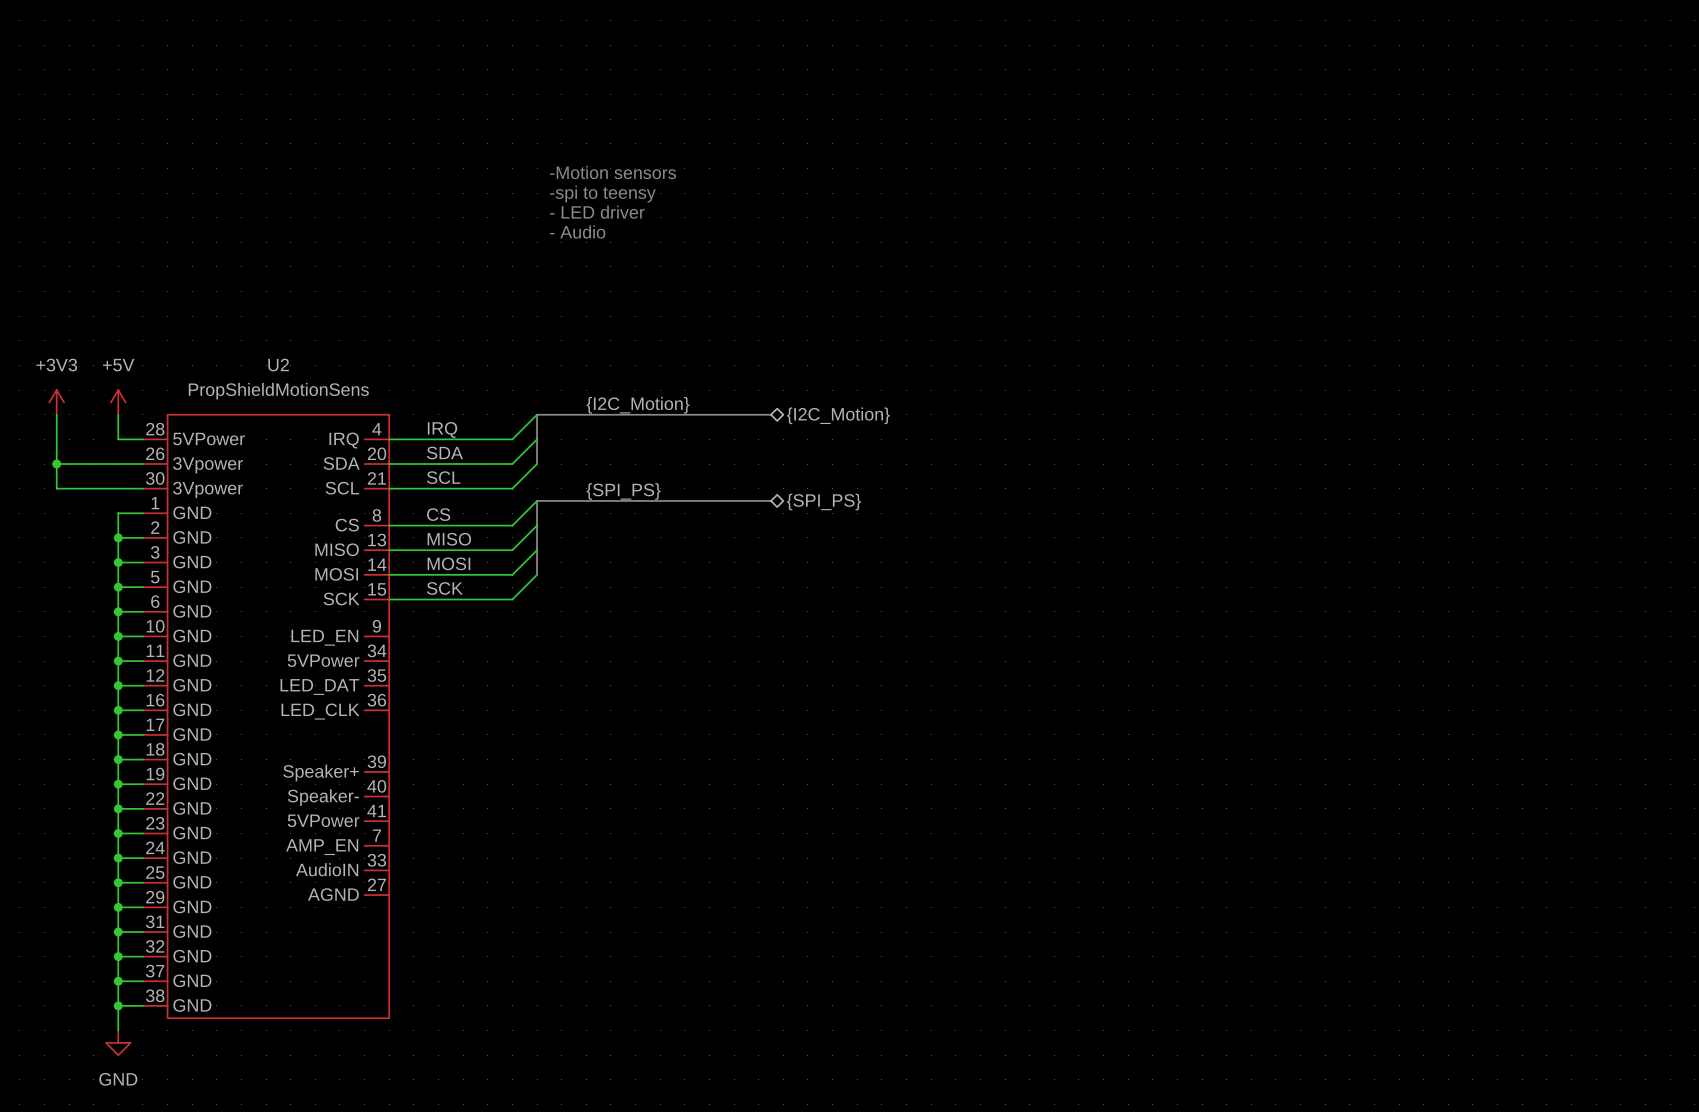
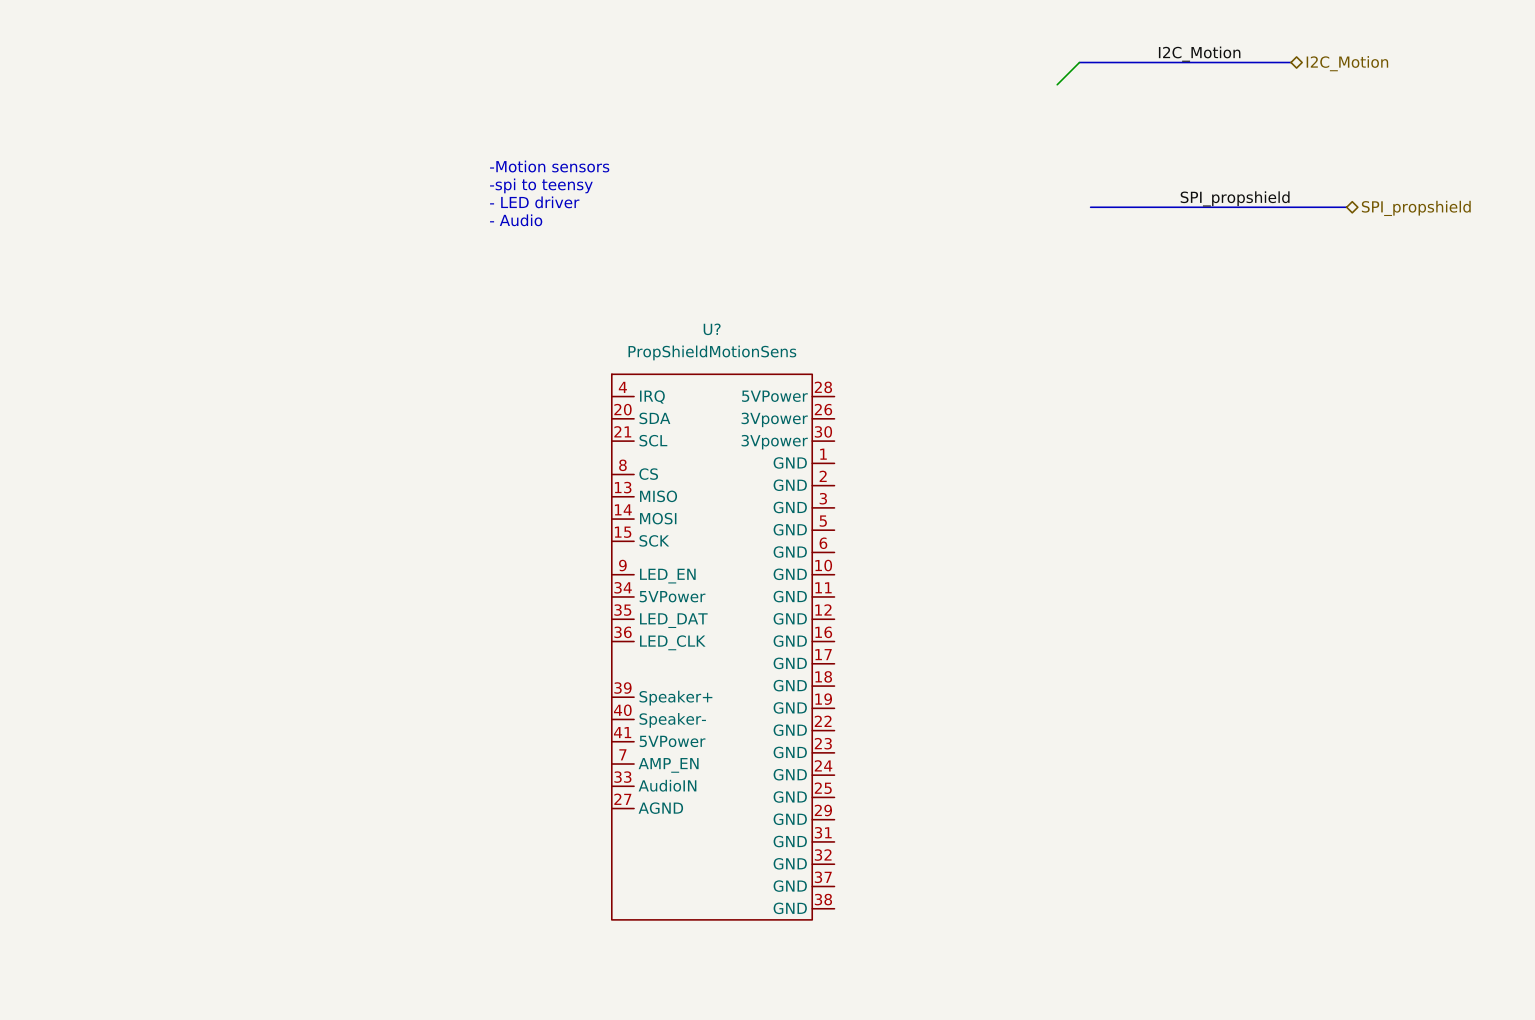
label: none -> I2C_Motion (1199, 54)
wire: none -> (1079, 62) (1057, 84)
bus: none -> (1079, 62) (1291, 62)
hierarchical label: none -> I2C_Motion (1347, 63)
label: none -> SPI_propshield (1235, 198)
bus: none -> (1090, 207) (1346, 207)
hierarchical label: none -> SPI_propshield (1416, 208)
power symbol: +3V3 (56, 402) -> none
power symbol: +5V (118, 402) -> none
label: {I2C_Motion} (638, 405) -> none
wire: (56, 414) (56, 488) (142, 488) -> none
wire: (118, 414) (118, 439) (142, 439) -> none
wire: (537, 414) (512, 439) (389, 439) -> none
bus: (771, 414) (537, 414) (537, 464) -> none
hierarchical label: {I2C_Motion} (838, 415) -> none
label: IRQ (442, 429) -> none
wire: (537, 439) (512, 464) (389, 464) -> none
label: SDA (444, 453) -> none
wire: (56, 464) (142, 464) -> none
junction: (56, 464) -> none
wire: (537, 464) (512, 488) (389, 488) -> none
label: SCL (443, 477) -> none
label: {SPI_PS} (623, 491) -> none
wire: (537, 500) (512, 525) (389, 525) -> none
bus: (771, 500) (537, 500) (537, 574) -> none
hierarchical label: {SPI_PS} (823, 502) -> none
wire: (142, 513) (118, 513) (118, 1030) -> none
label: CS (438, 514) -> none
wire: (537, 525) (512, 550) (389, 550) -> none
wire: (118, 537) (142, 537) -> none
junction: (118, 537) -> none
label: MISO (449, 539) -> none
wire: (537, 550) (512, 574) (389, 574) -> none
wire: (118, 562) (142, 562) -> none
junction: (118, 562) -> none
label: MOSI (448, 563) -> none
wire: (537, 574) (512, 599) (389, 599) -> none
wire: (118, 587) (142, 587) -> none
junction: (118, 587) -> none
label: SCK (444, 588) -> none
wire: (118, 611) (142, 611) -> none
junction: (118, 611) -> none
wire: (118, 636) (142, 636) -> none
junction: (118, 636) -> none
wire: (118, 661) (142, 661) -> none
junction: (118, 661) -> none
wire: (118, 685) (142, 685) -> none
junction: (118, 685) -> none
U?: none -> PropShieldMotionSens (723, 647)
wire: (118, 710) (142, 710) -> none
junction: (118, 710) -> none
U2: PropShieldMotionSens (266, 716) -> none
wire: (118, 734) (142, 734) -> none
junction: (118, 734) -> none
wire: (118, 759) (142, 759) -> none
junction: (118, 759) -> none
wire: (118, 784) (142, 784) -> none
junction: (118, 784) -> none
wire: (118, 808) (142, 808) -> none
junction: (118, 808) -> none
wire: (118, 833) (142, 833) -> none
junction: (118, 833) -> none
wire: (118, 858) (142, 858) -> none
junction: (118, 858) -> none
wire: (118, 882) (142, 882) -> none
junction: (118, 882) -> none
wire: (118, 907) (142, 907) -> none
junction: (118, 907) -> none
wire: (118, 932) (142, 932) -> none
junction: (118, 932) -> none
wire: (118, 956) (142, 956) -> none
junction: (118, 956) -> none
wire: (118, 981) (142, 981) -> none
junction: (118, 981) -> none
wire: (118, 1005) (142, 1005) -> none
junction: (118, 1005) -> none
power symbol: GND (118, 1042) -> none

